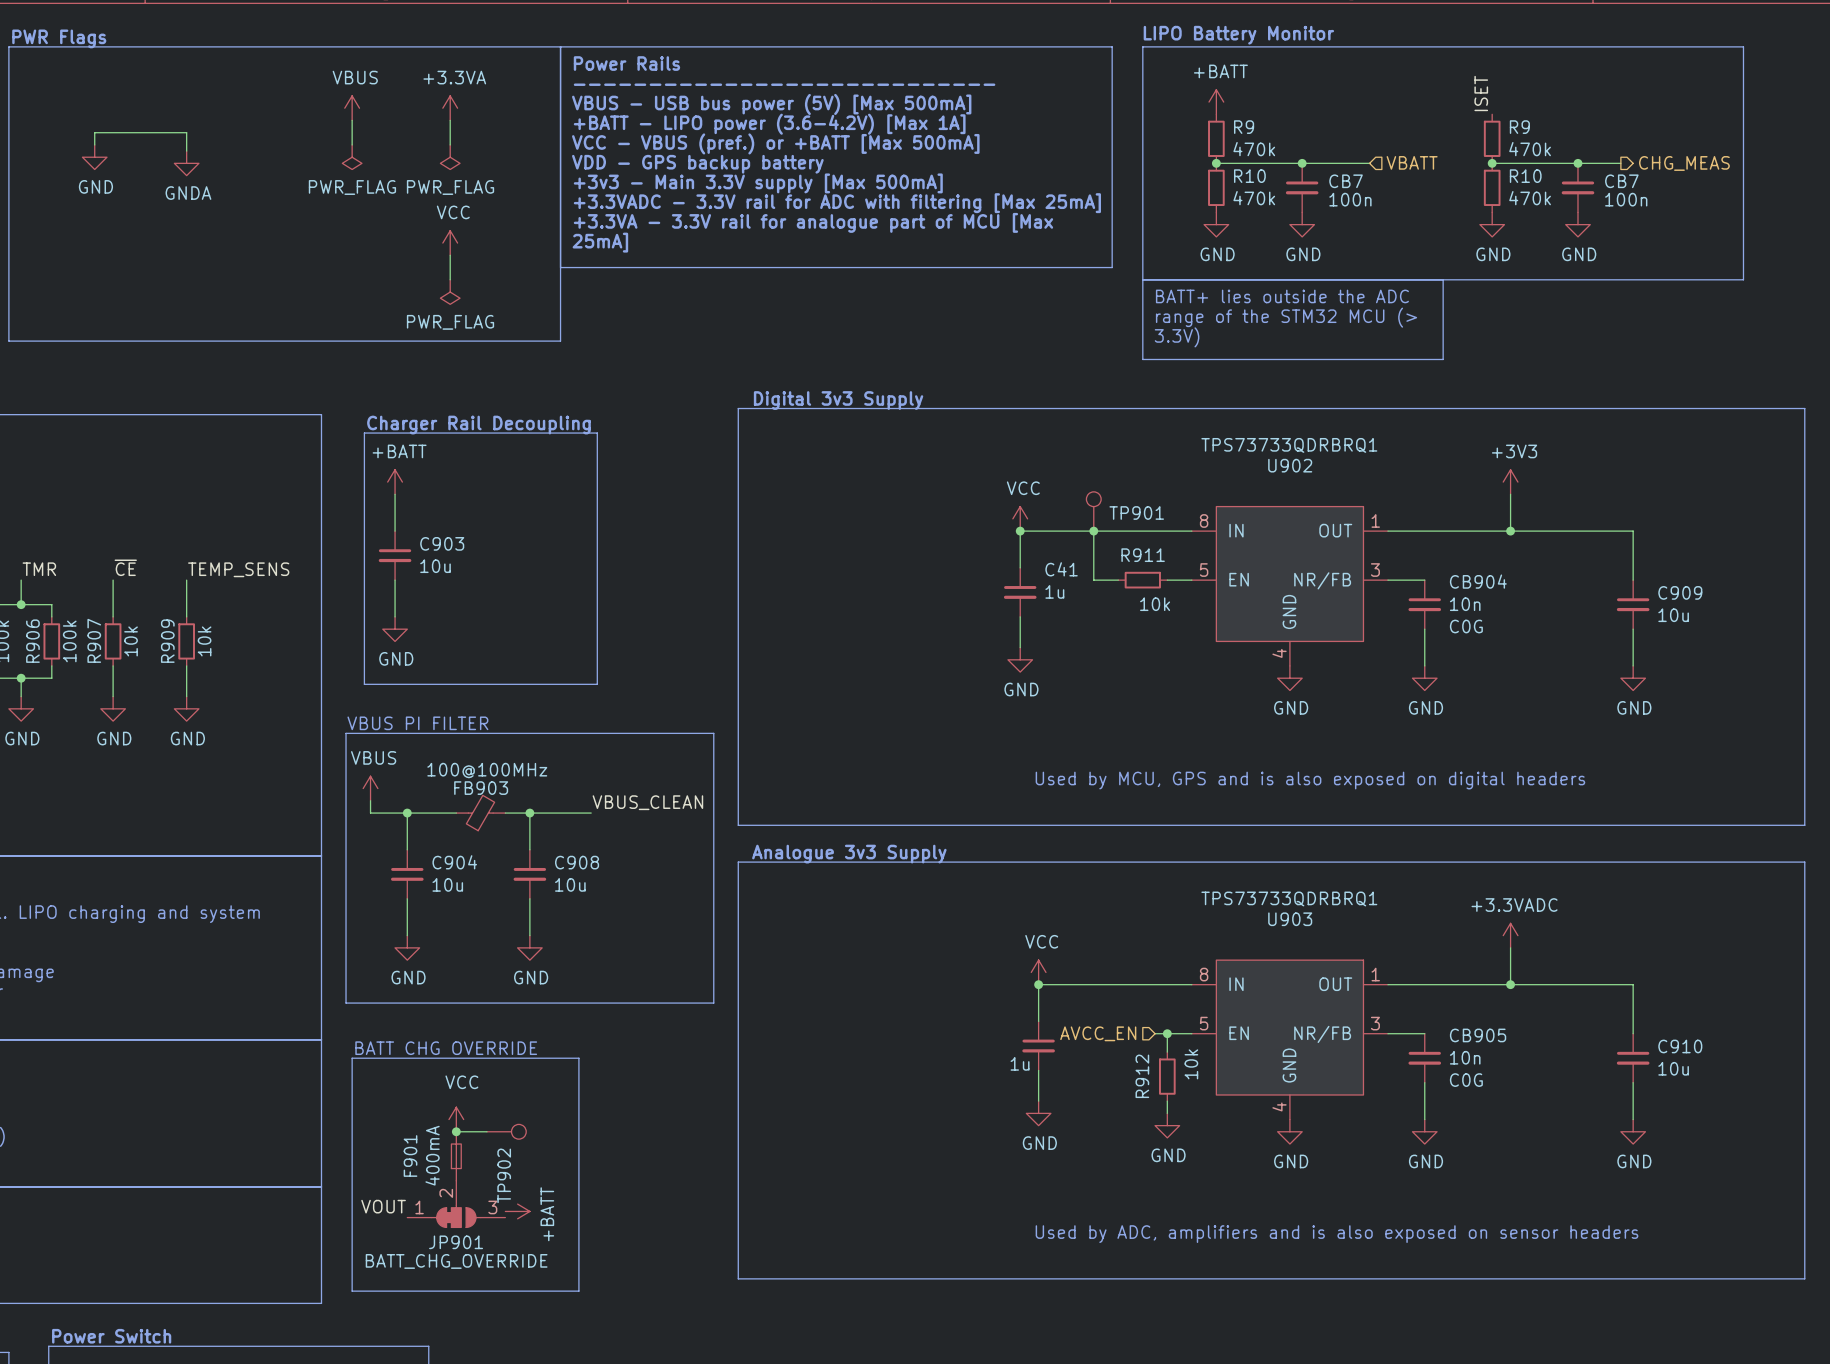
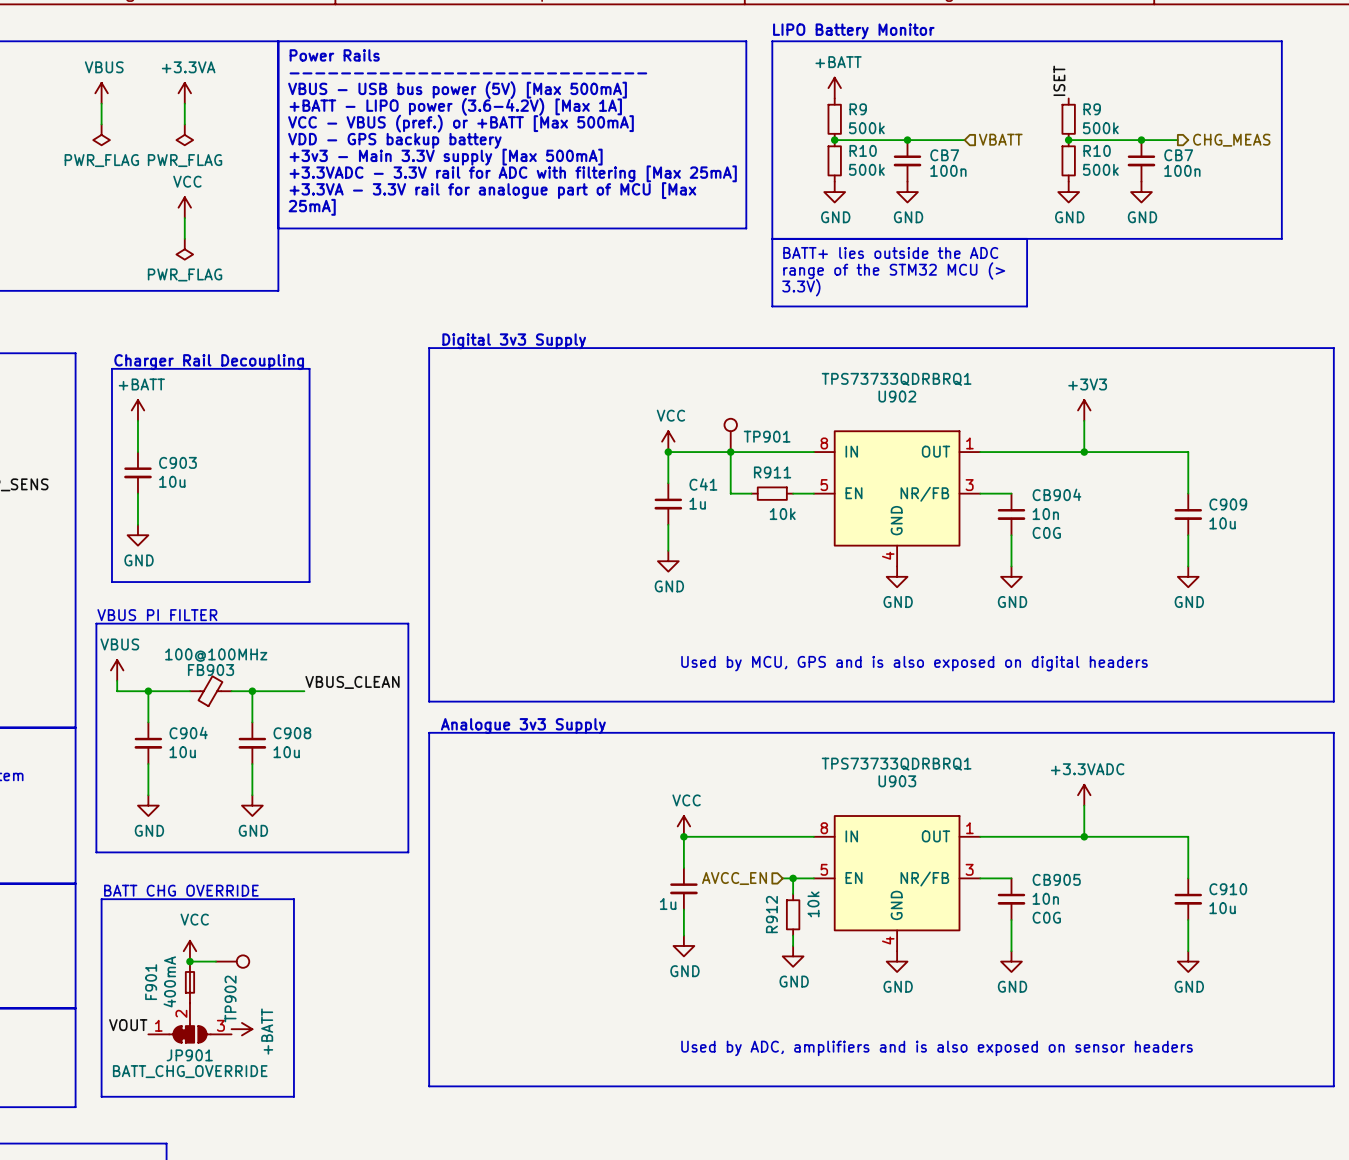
R9 value: 470k (1254, 149) -> 500k (866, 128)
R9 value: 470k (1530, 149) -> 500k (1100, 128)
R10 value: 470k (1254, 198) -> 500k (866, 169)
R10 value: 470k (1530, 198) -> 500k (1100, 169)

